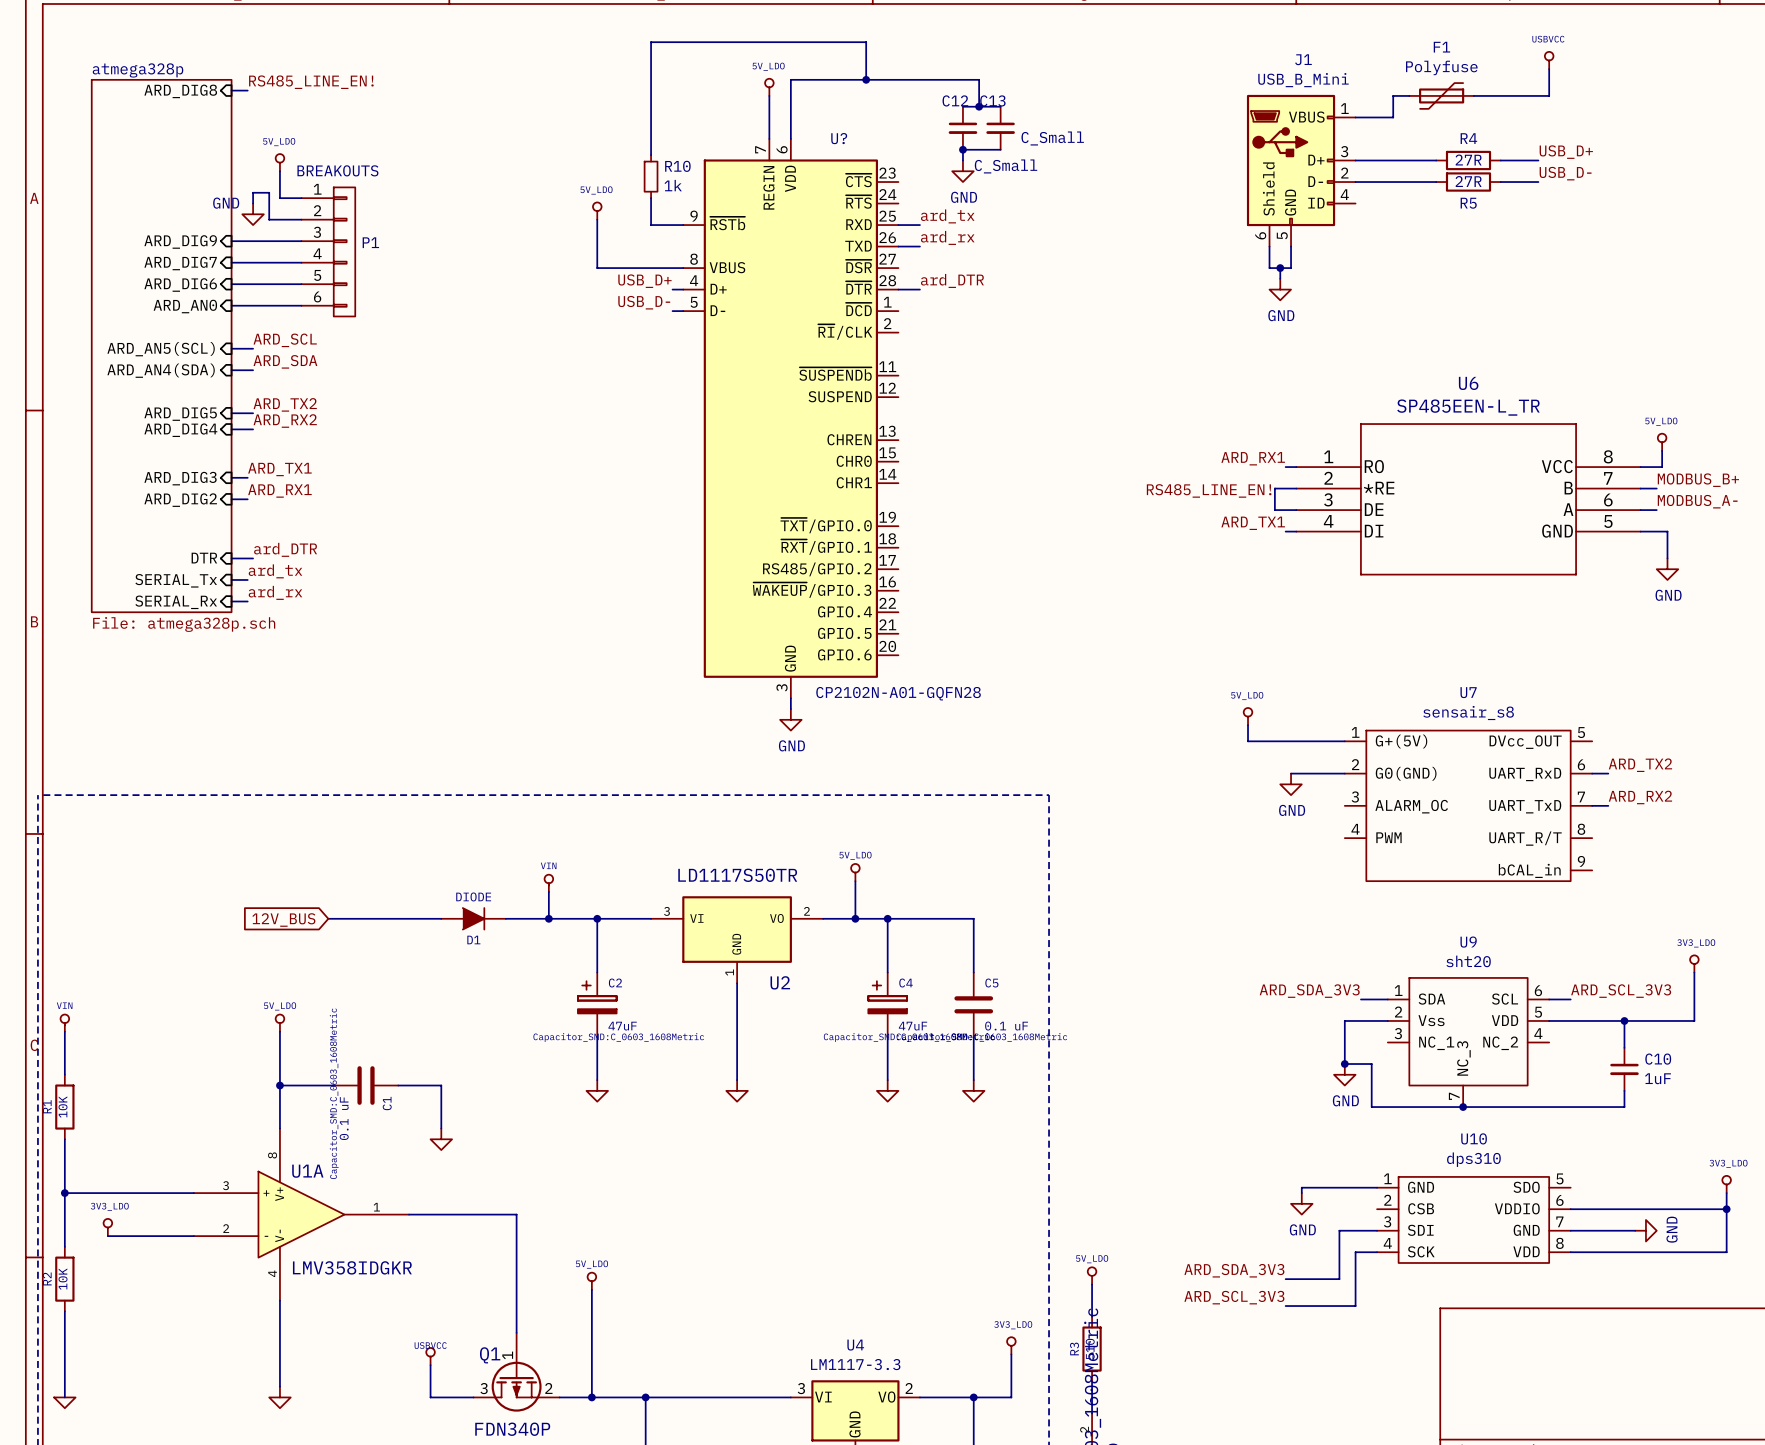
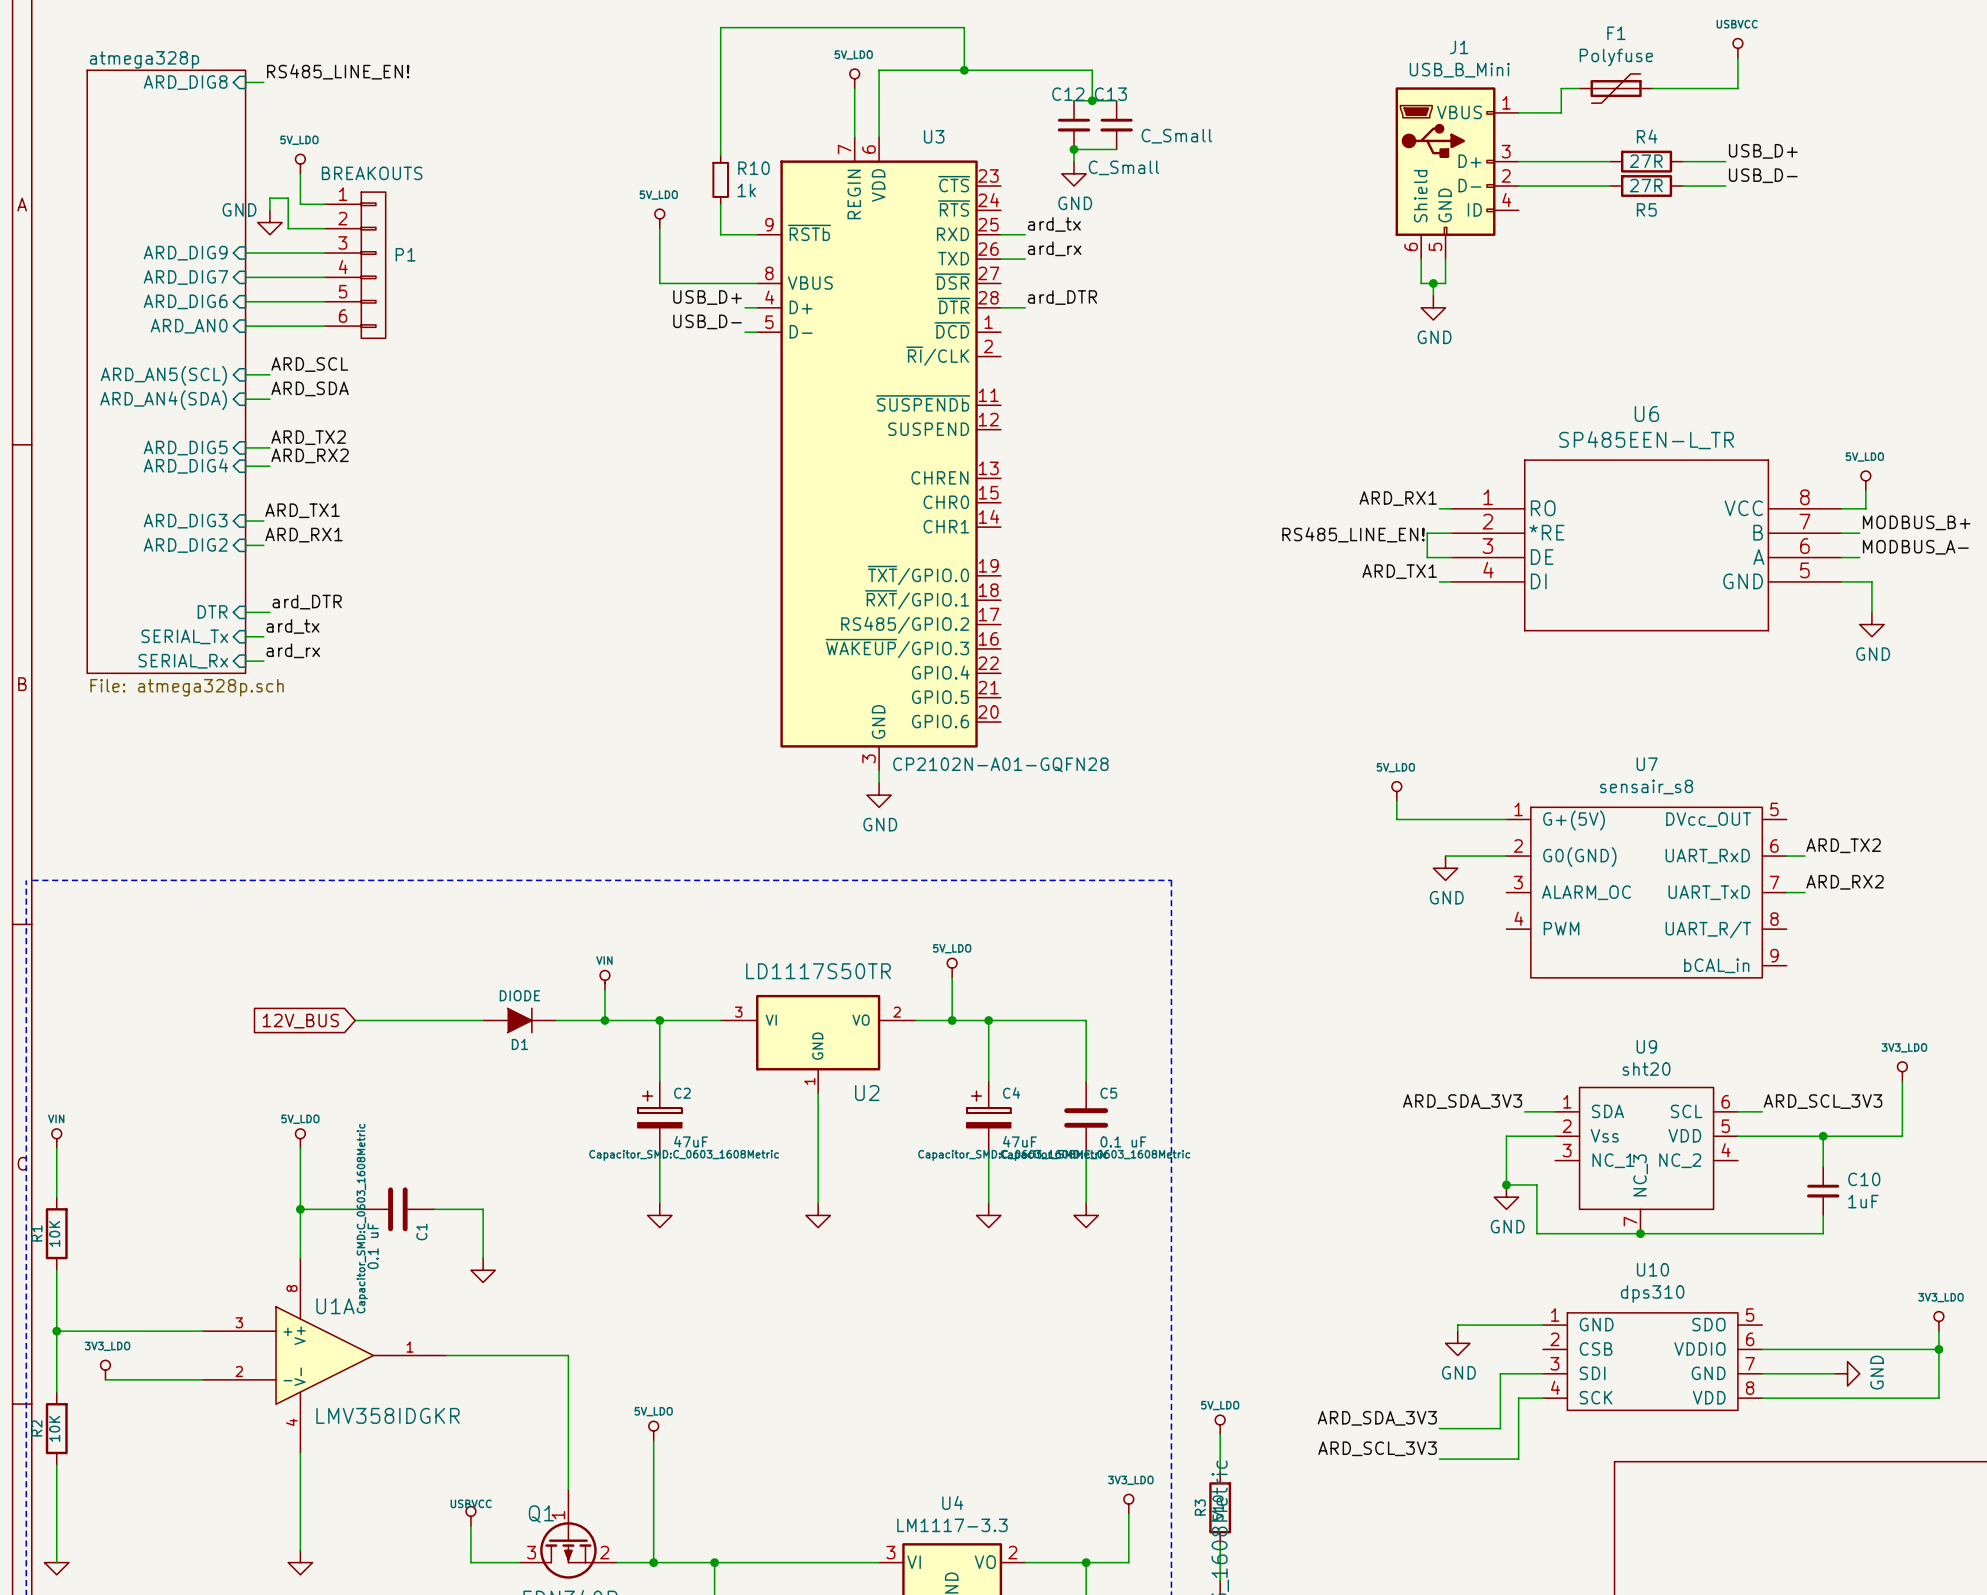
U? name: U? (839, 138) -> U3 (934, 136)

